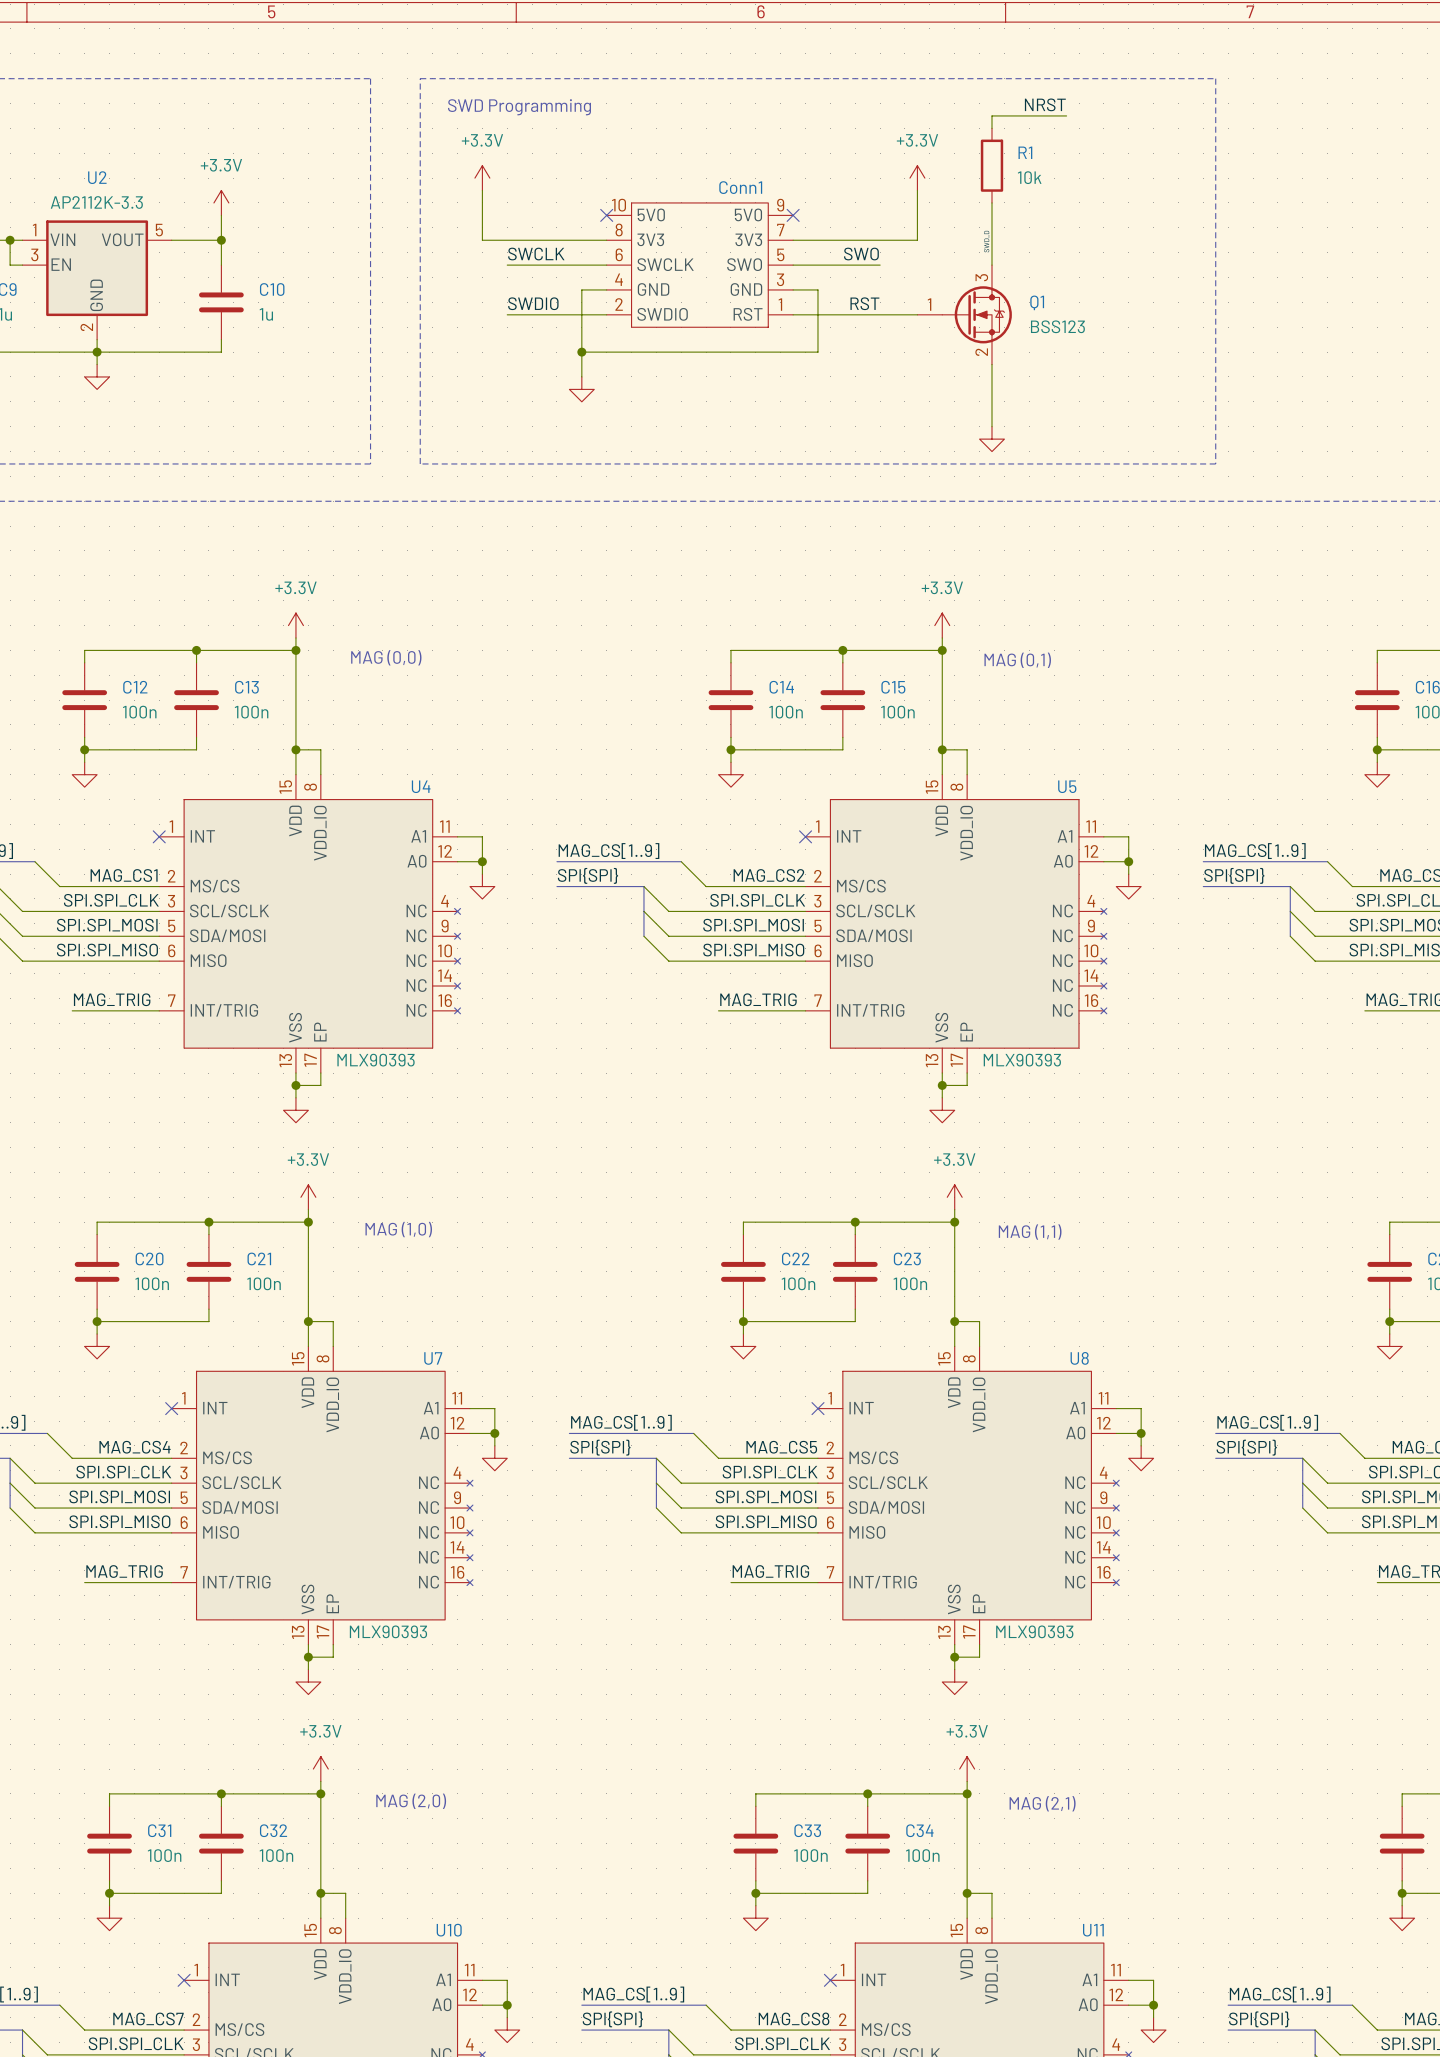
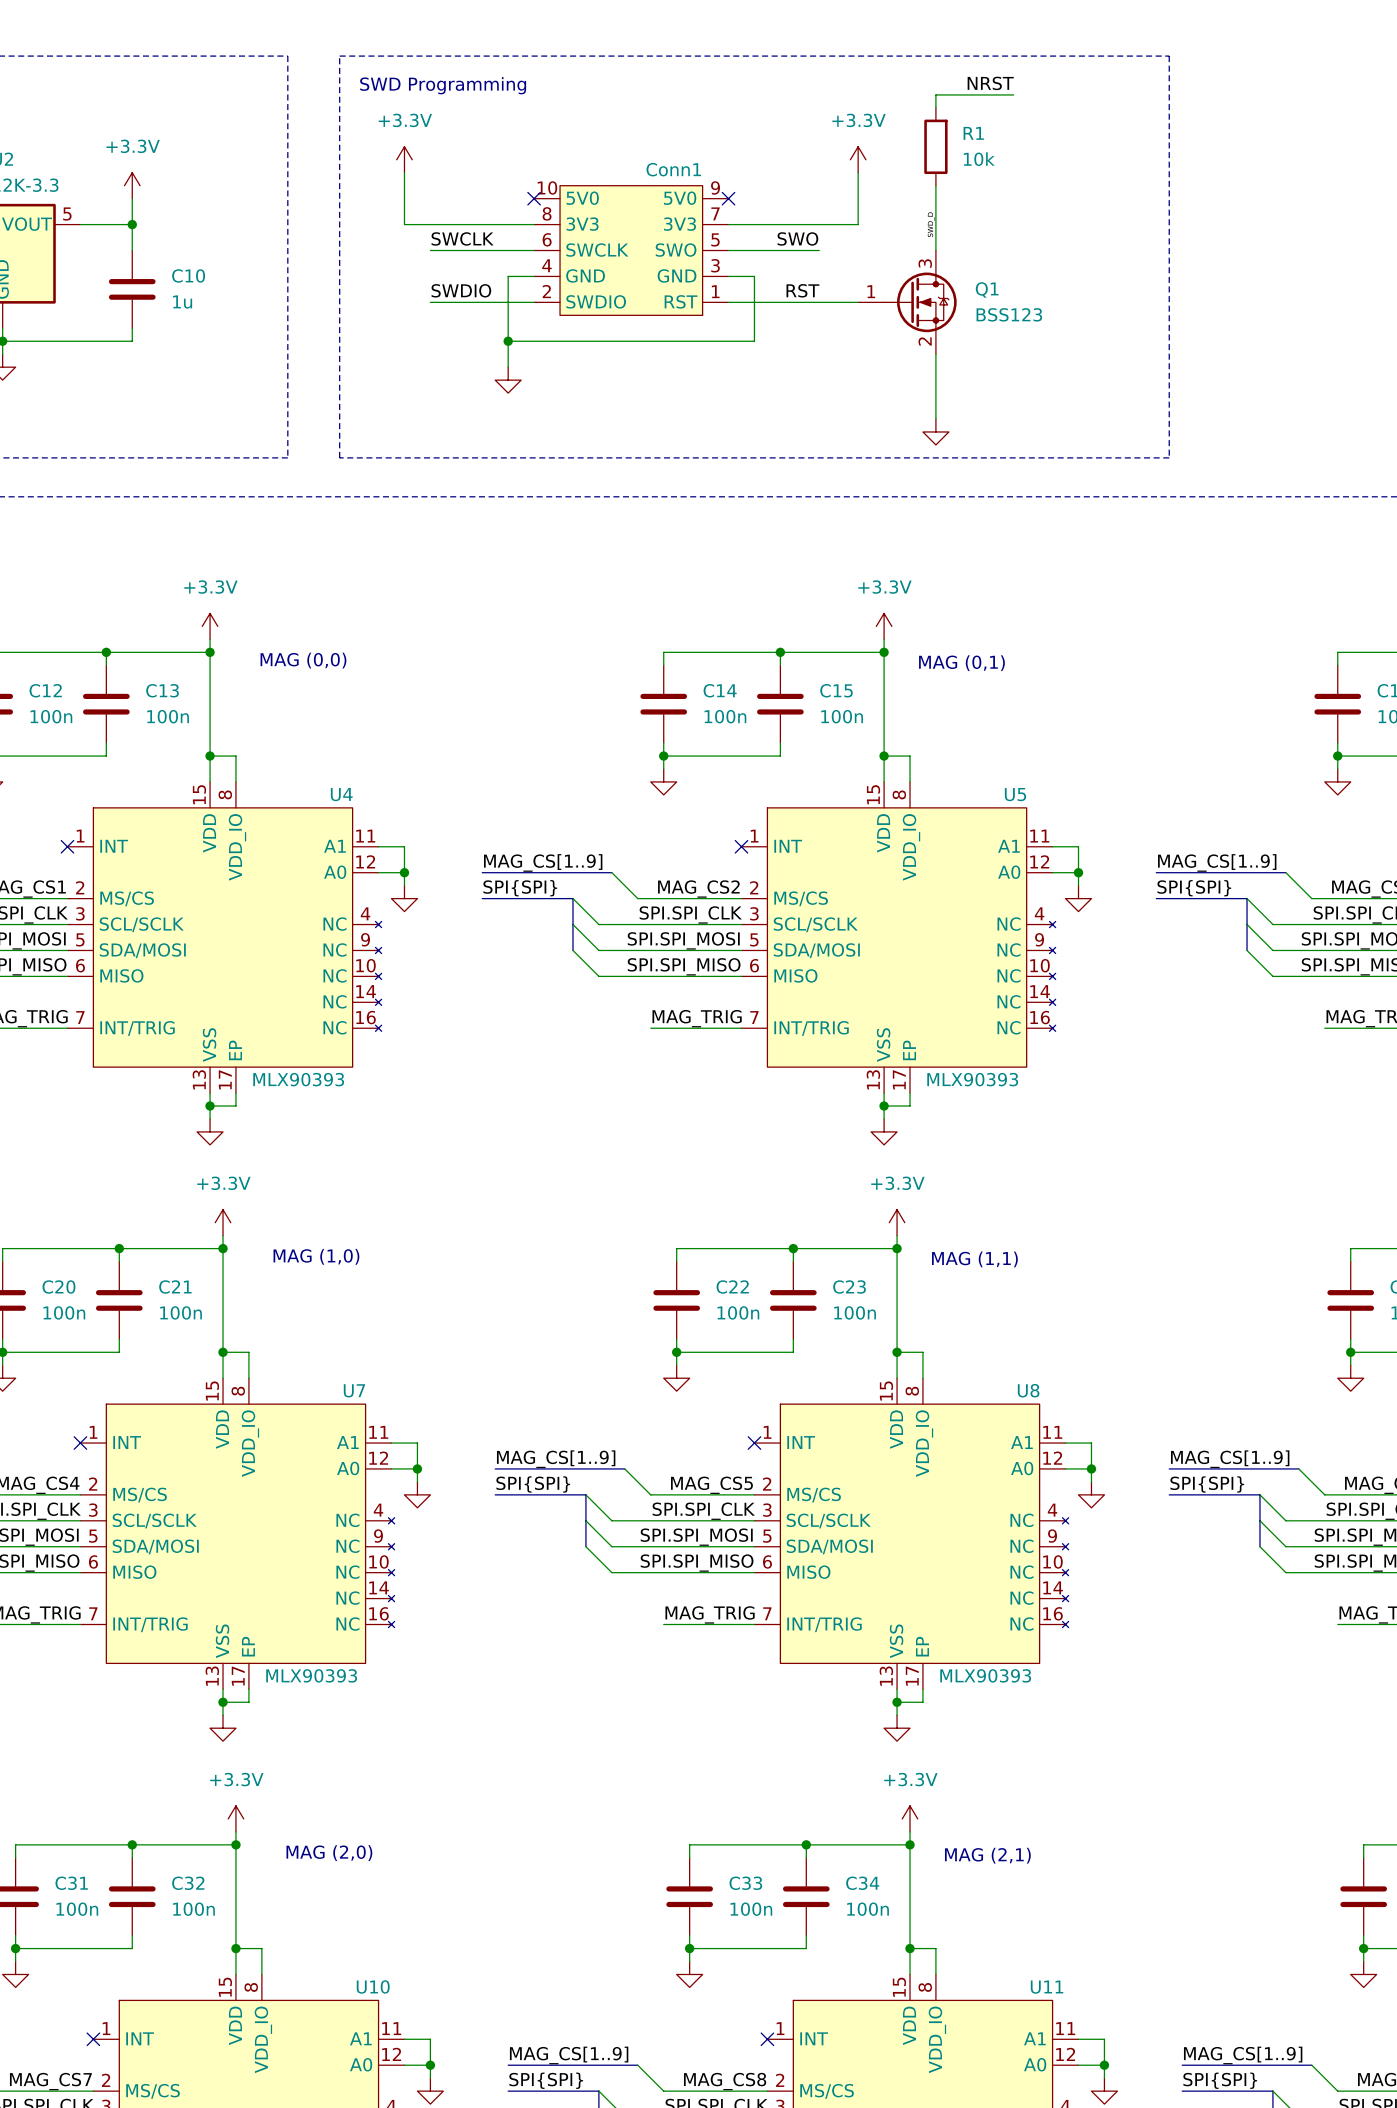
Conn1 symbol: [606, 202, 794, 328] -> [534, 185, 729, 316]

